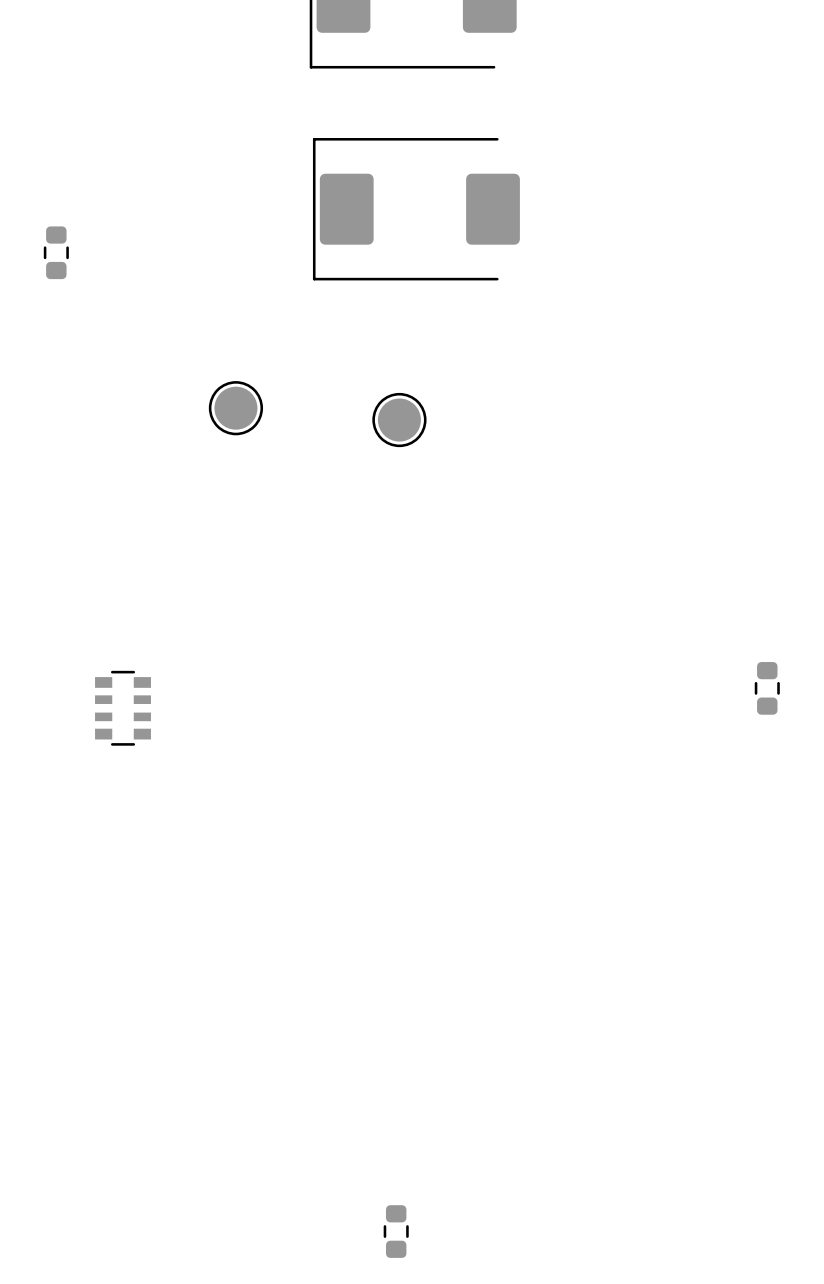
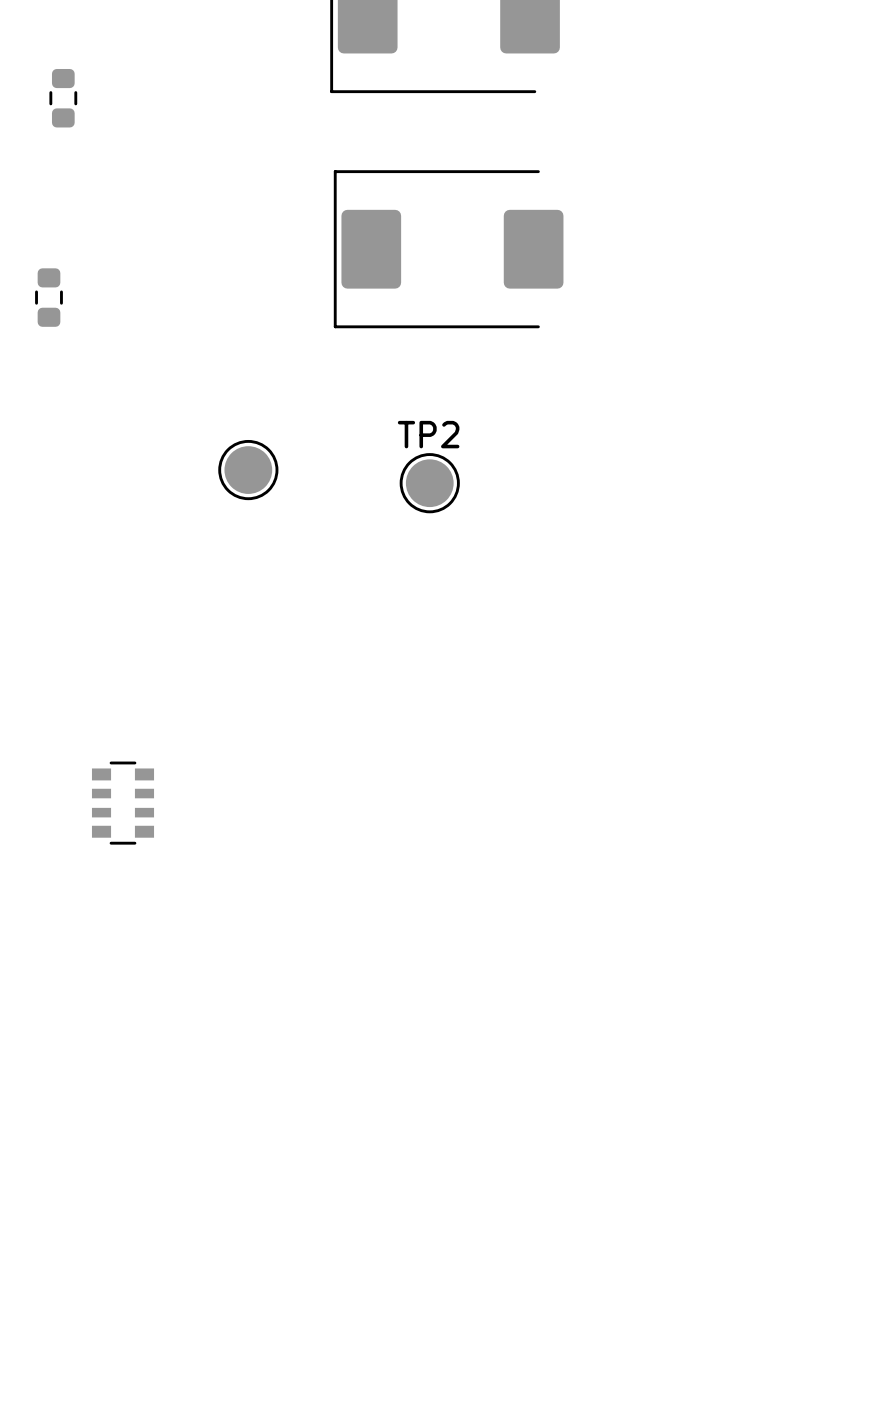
part: none -> (63, 98)
TP2 name: none -> TP2 (428, 434)
part: (767, 688) -> none
part: (396, 1231) -> none

